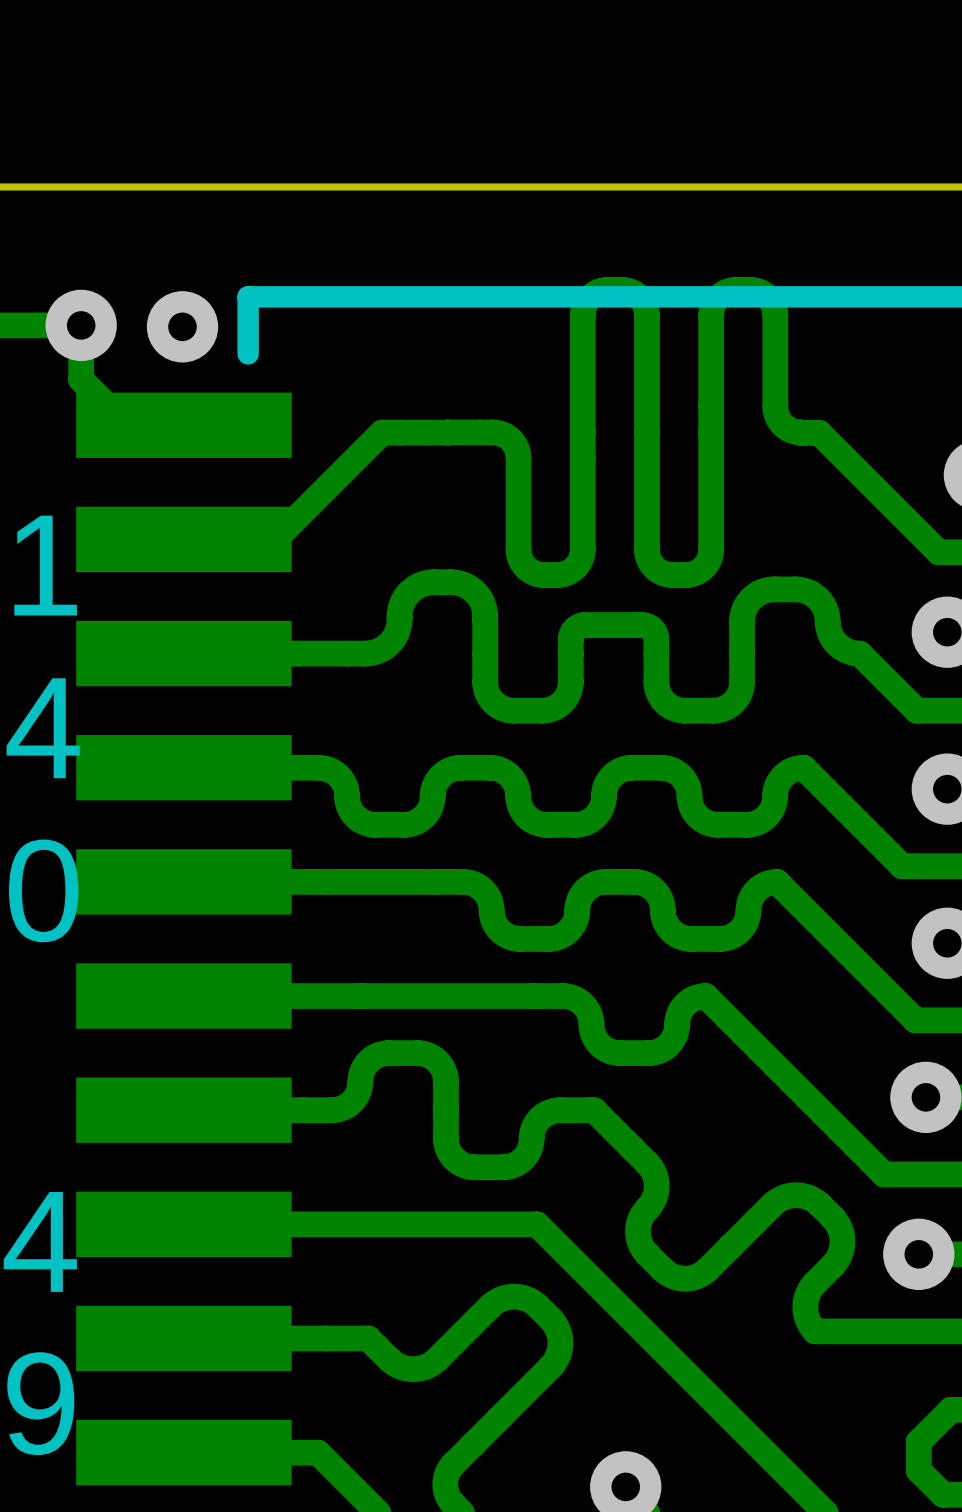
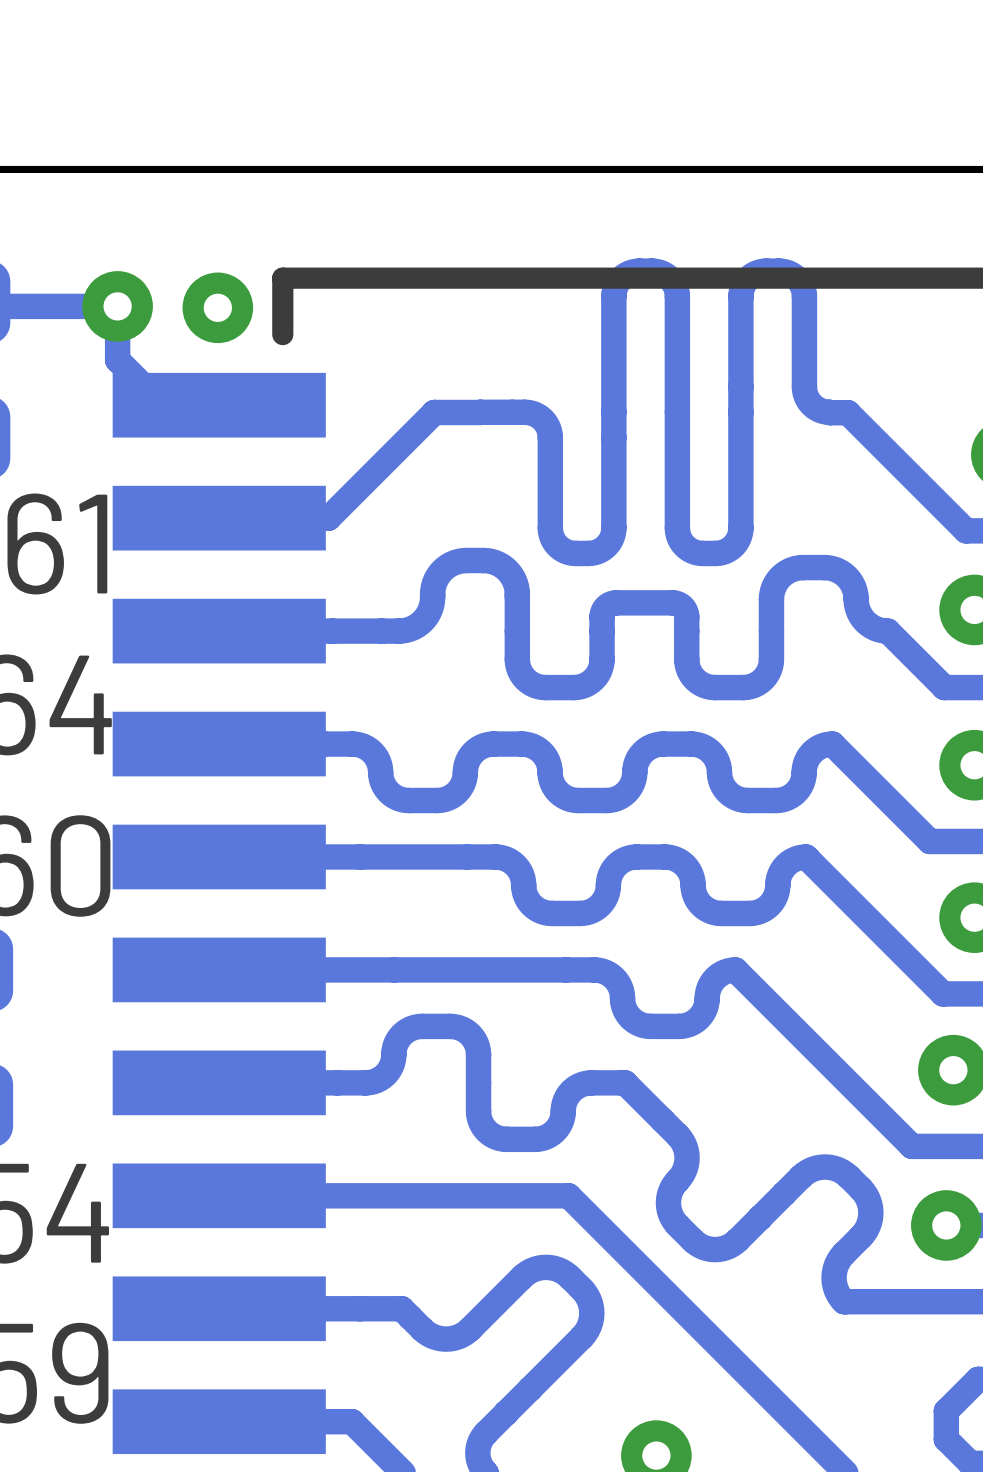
track: (401, 432) (382, 432) (275, 539) -> (434, 412) (328, 518) (309, 518)

